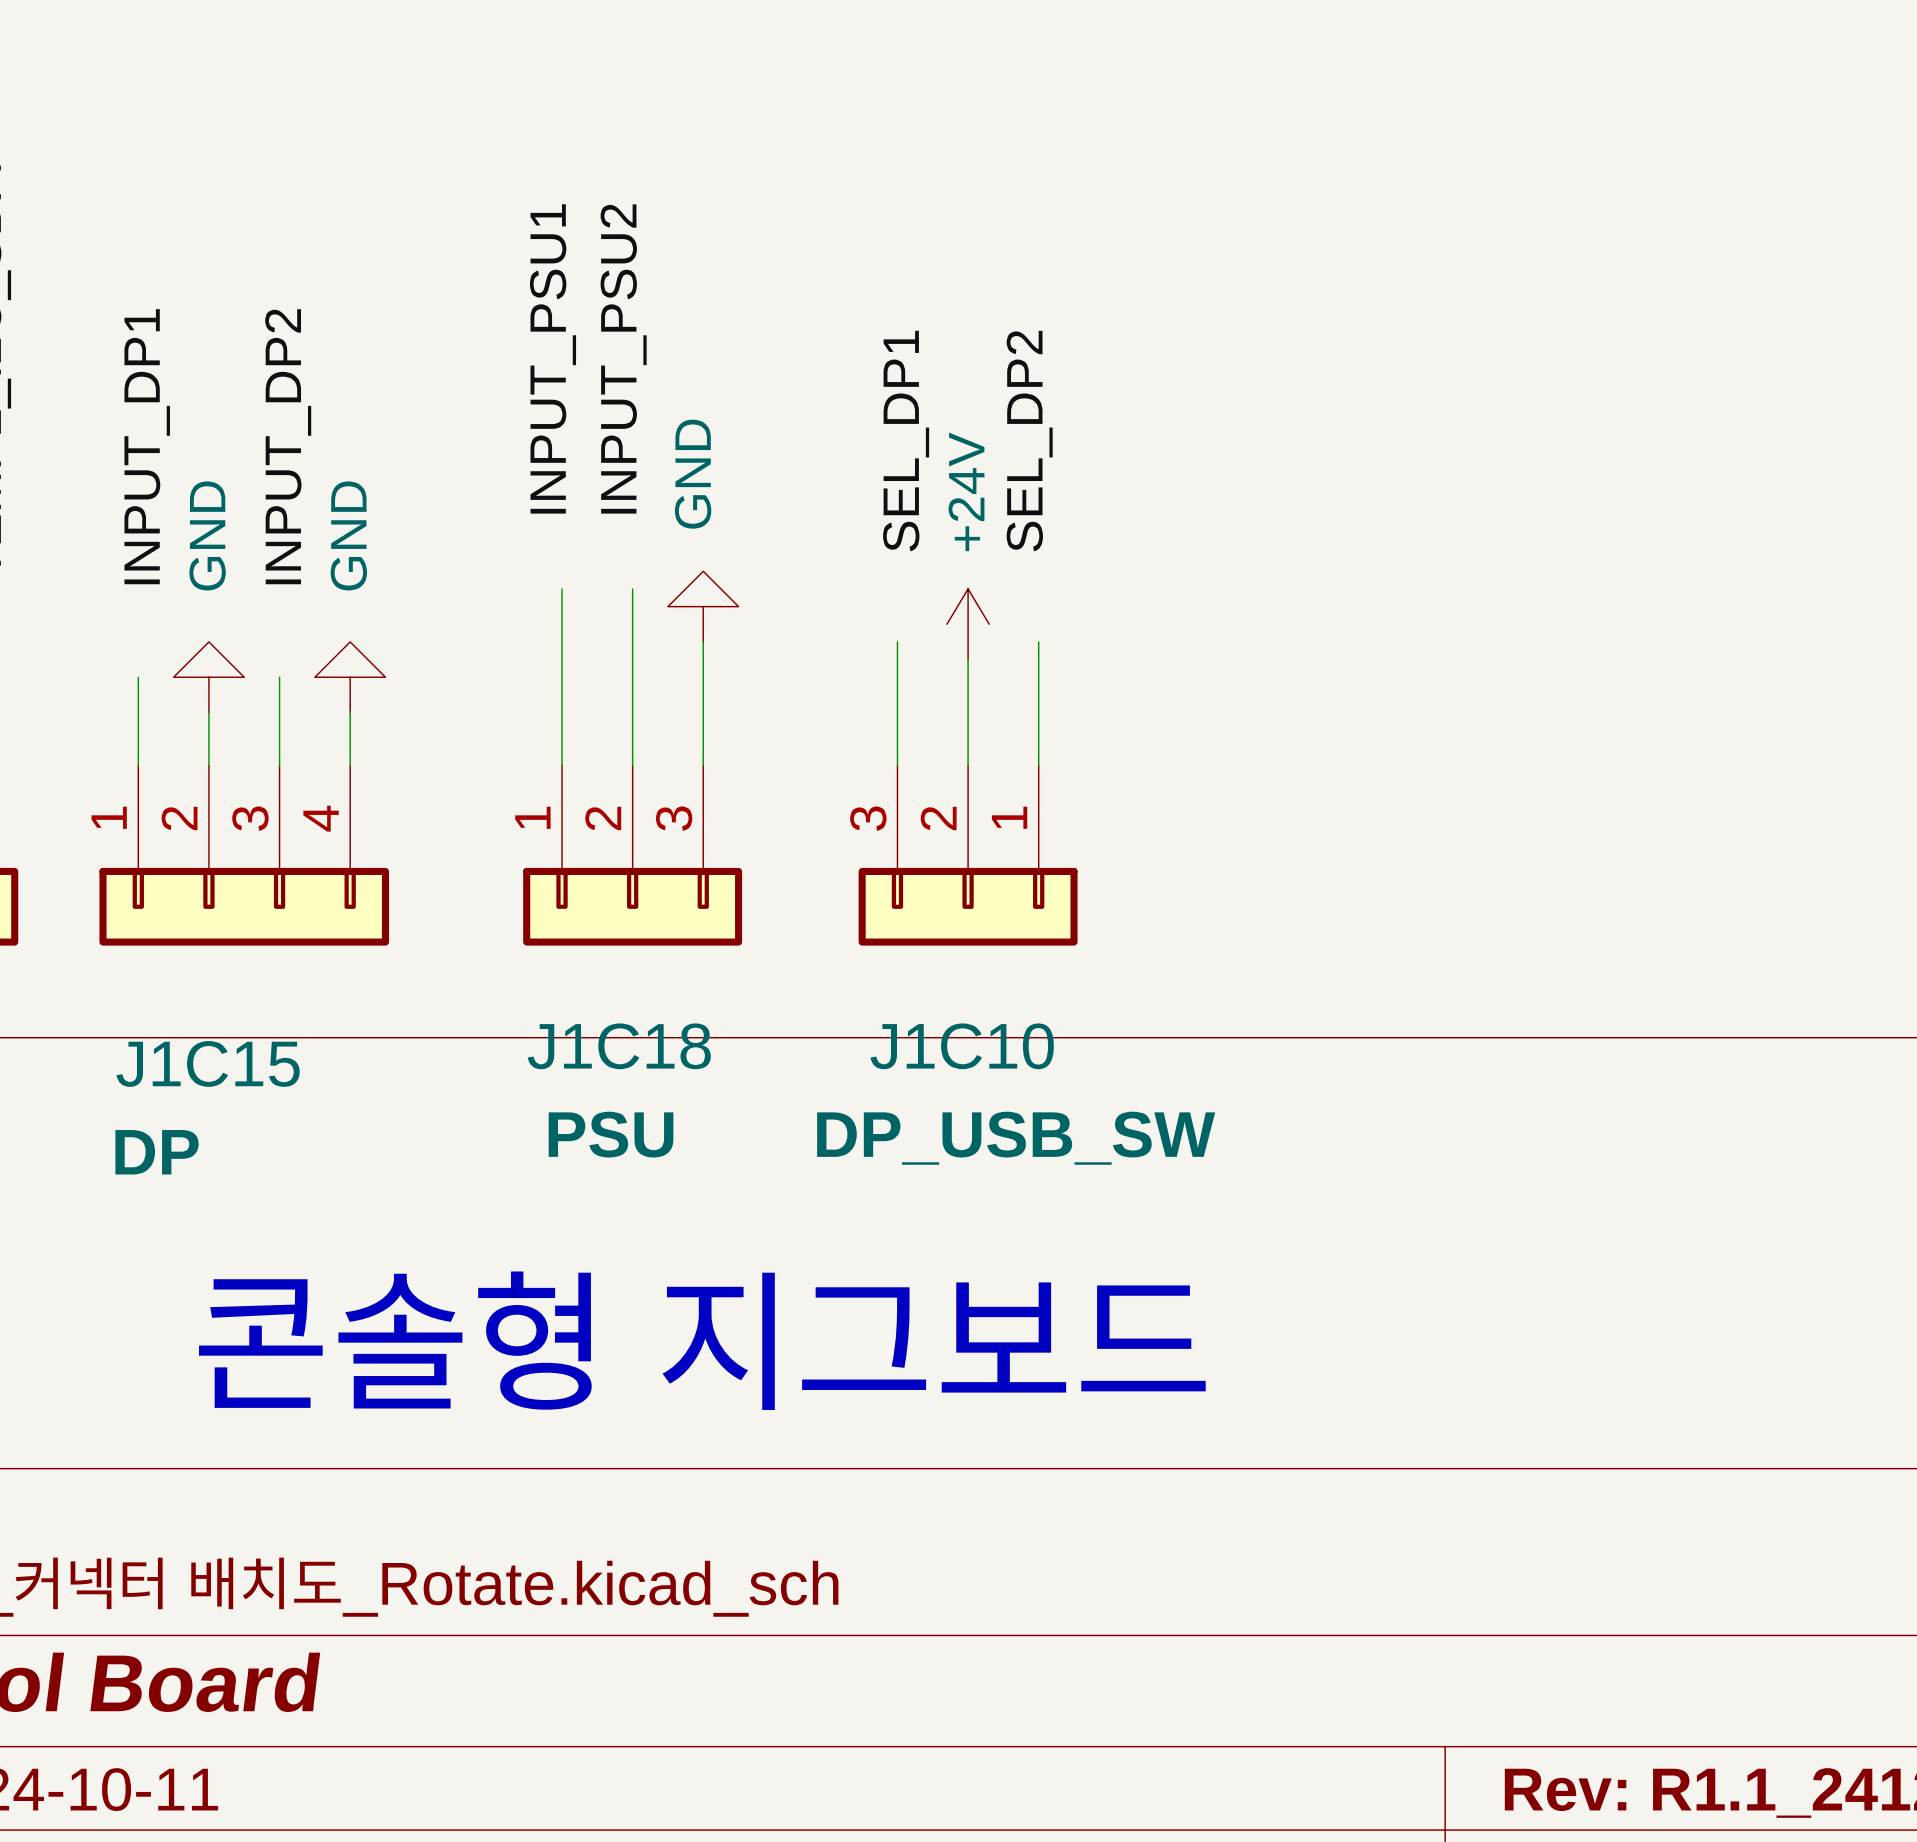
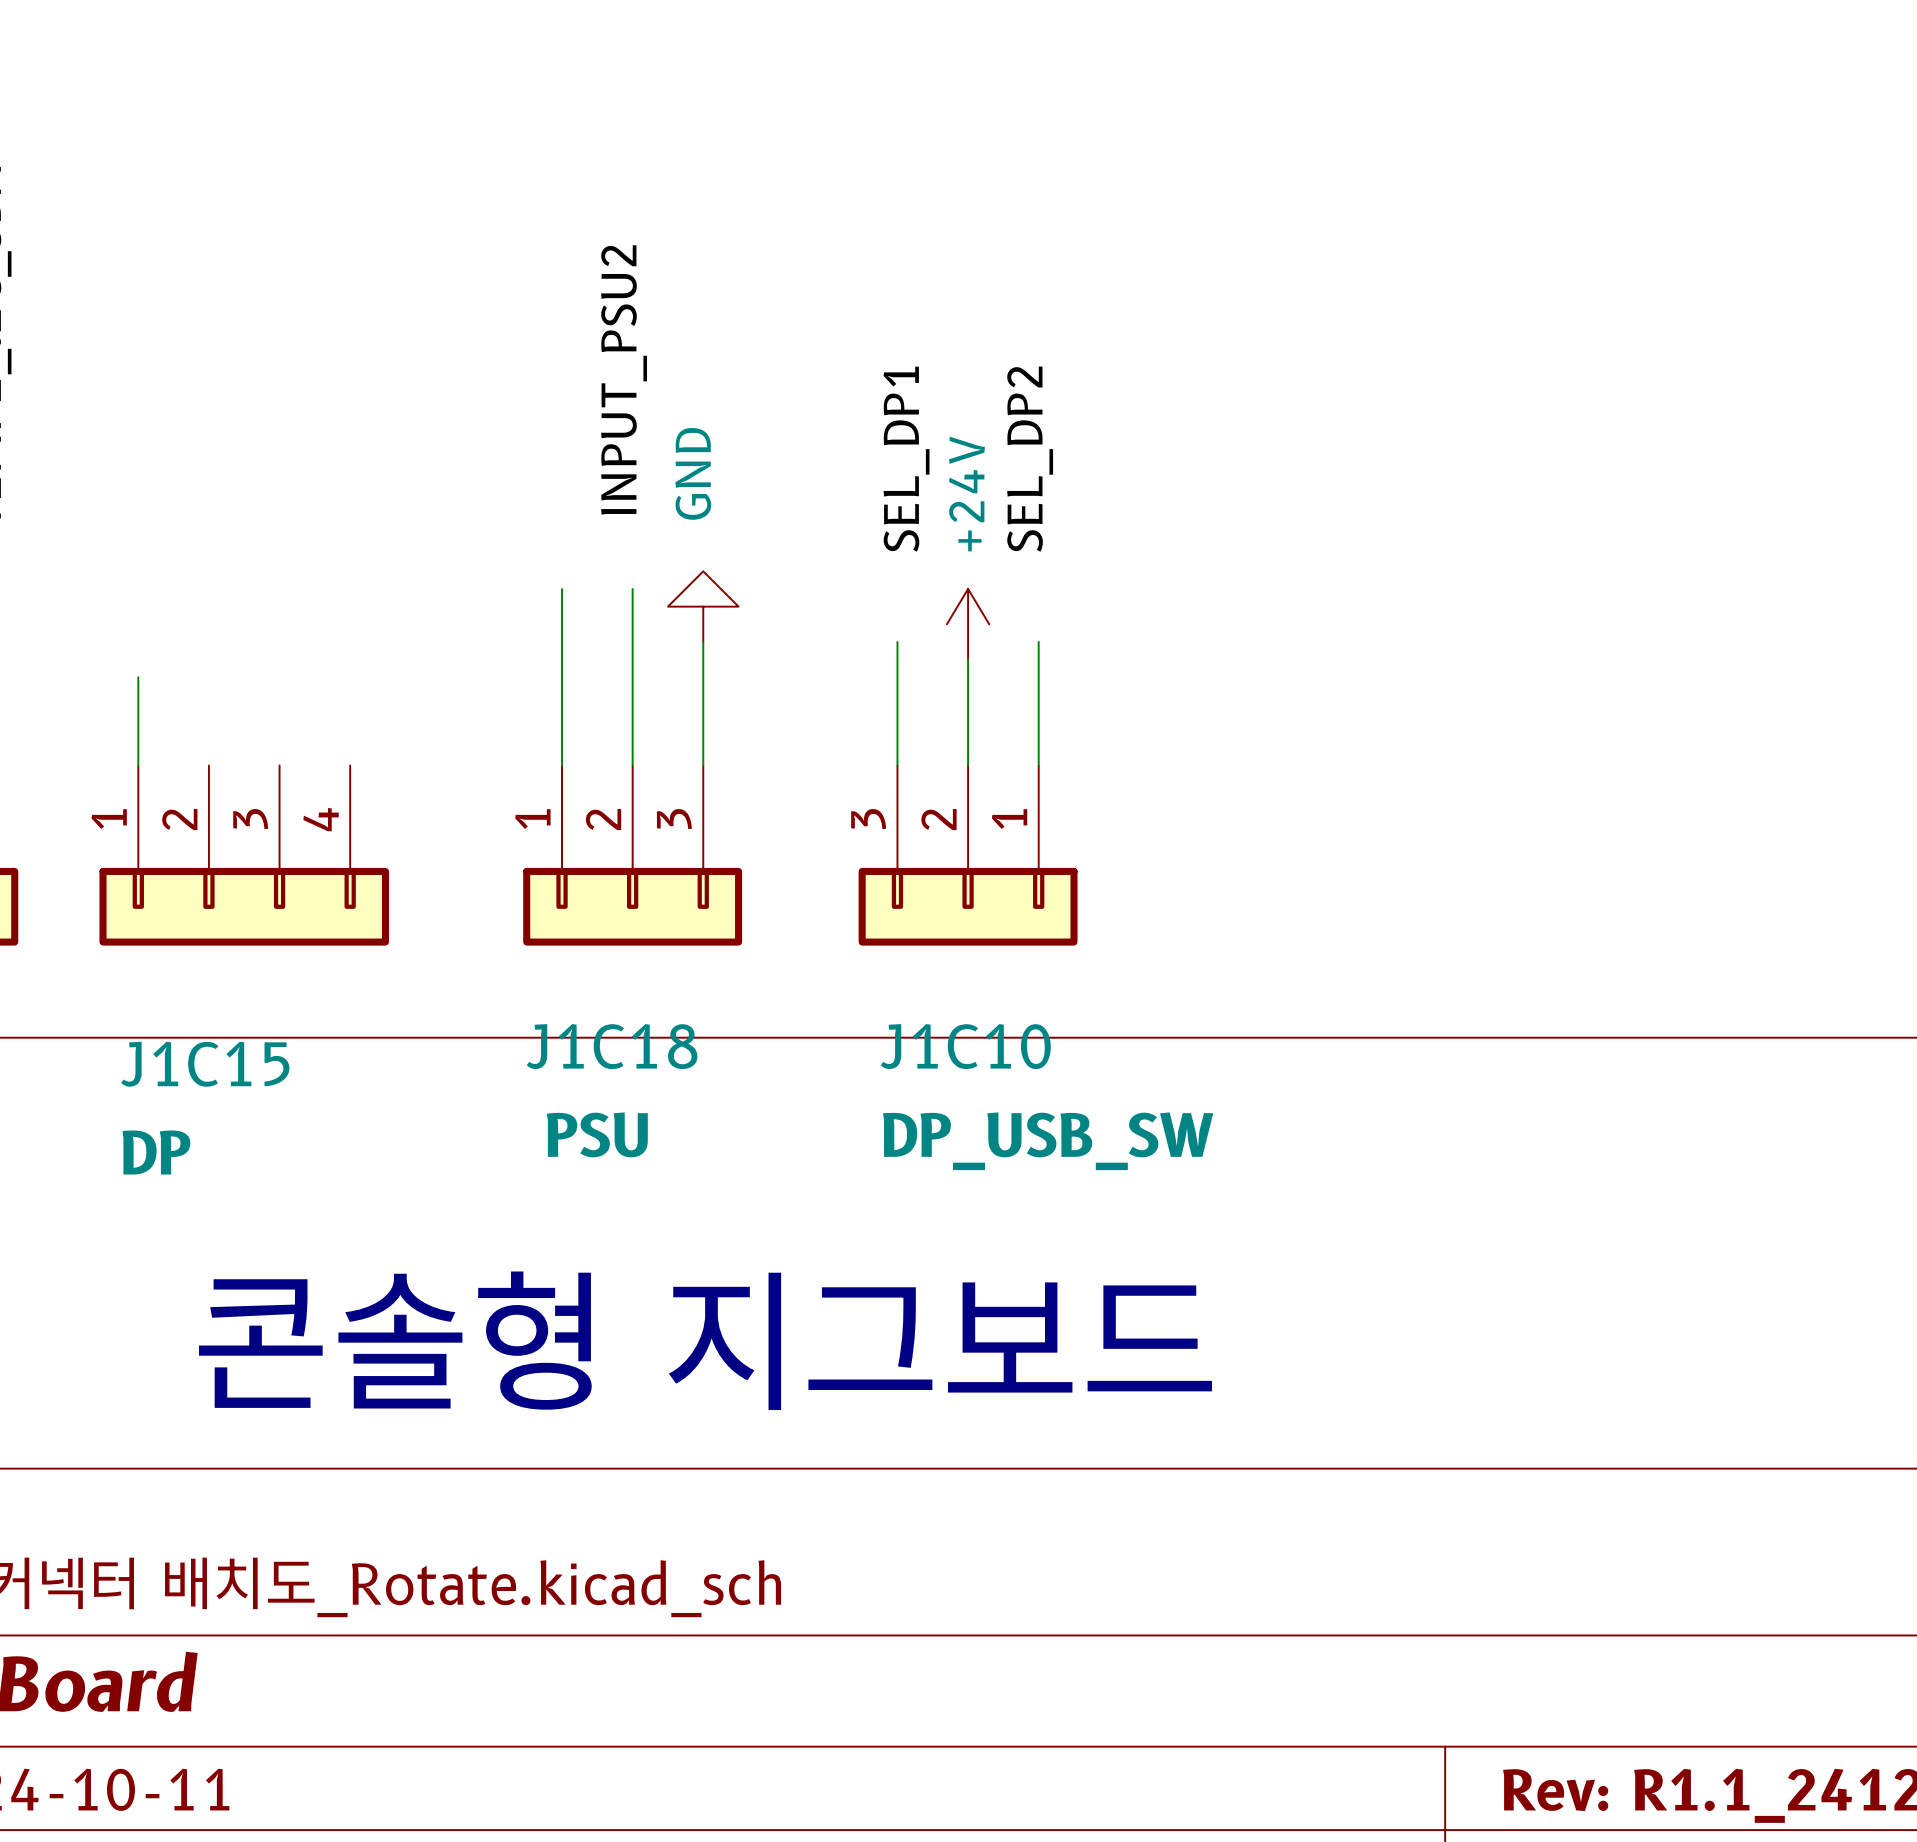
label: INPUT_PSU1 (553, 358) -> none
label: INPUT_DP1 (147, 446) -> none
label: INPUT_DP2 (288, 446) -> none
power symbol: GND (208, 677) -> none
wire: (279, 677) (279, 765) -> none
power symbol: GND (350, 677) -> none
wire: (208, 712) (208, 765) -> none
wire: (350, 712) (350, 765) -> none

